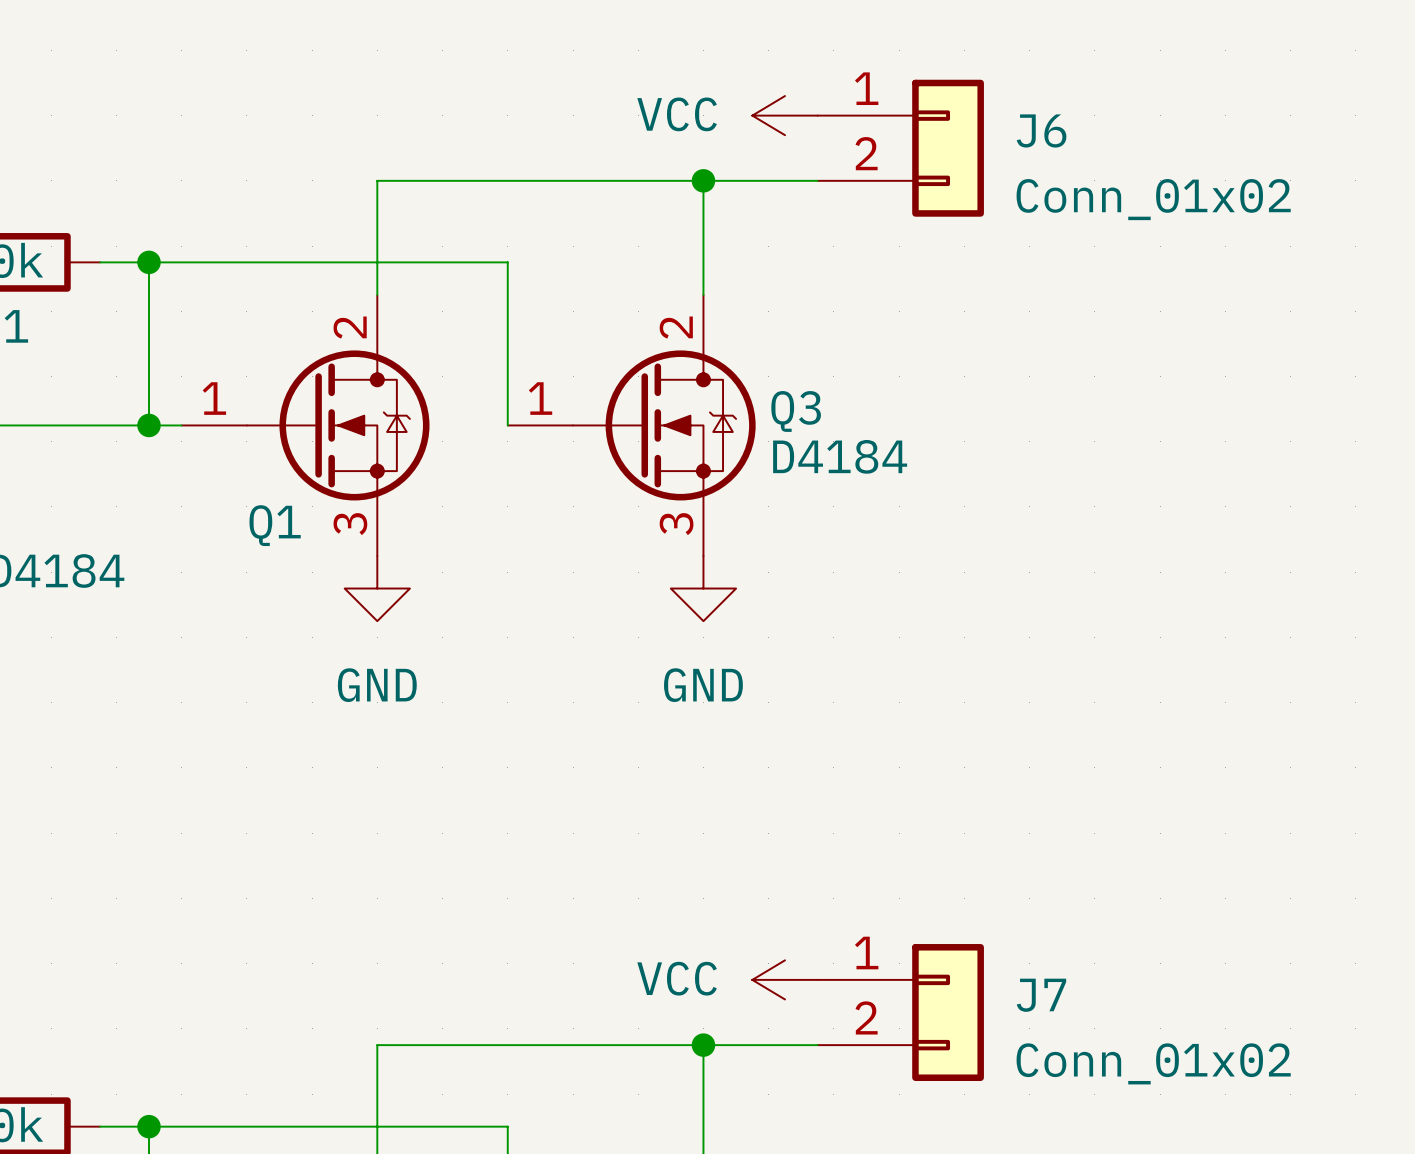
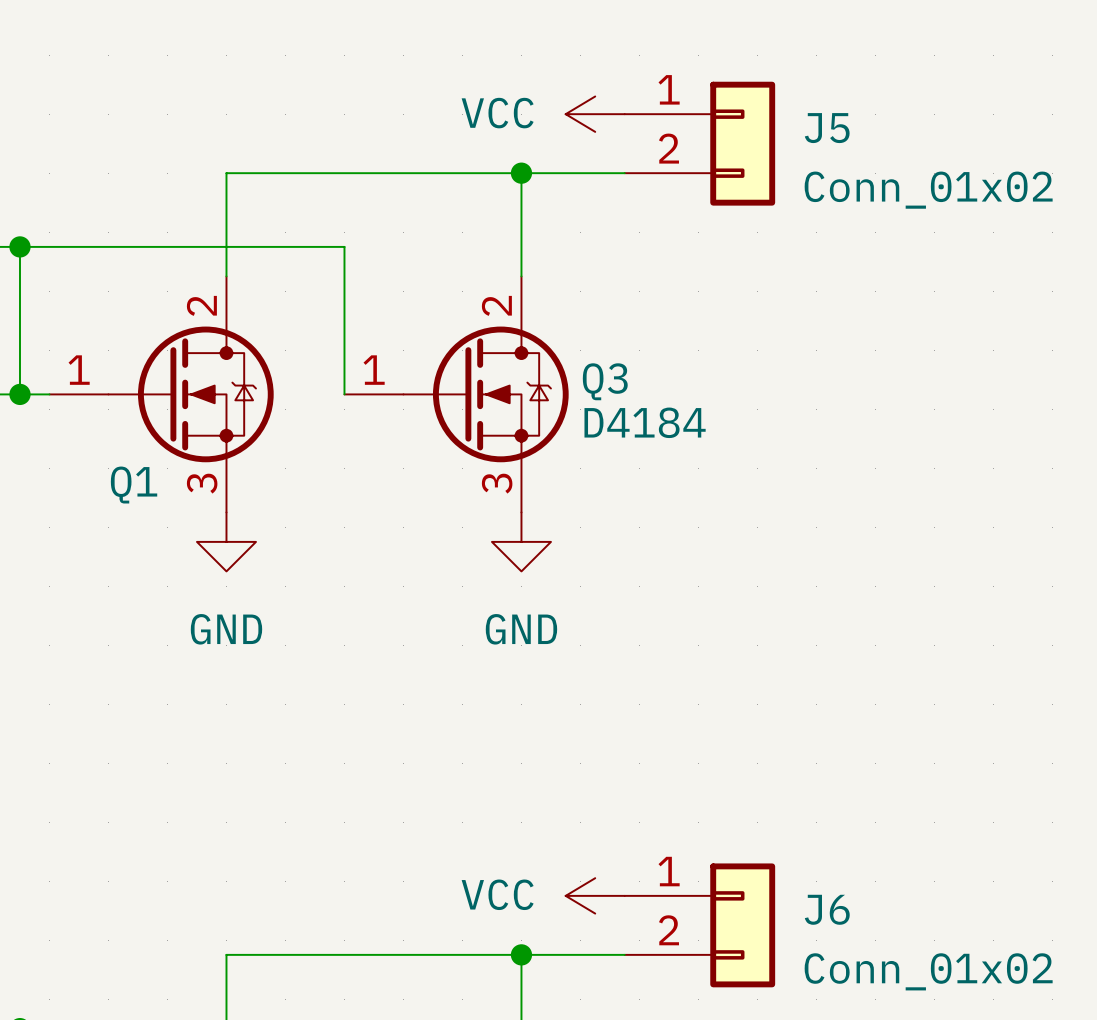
J6 name: J6 (1041, 130) -> J5 (827, 128)
J7 name: J7 (1041, 995) -> J6 (827, 909)

